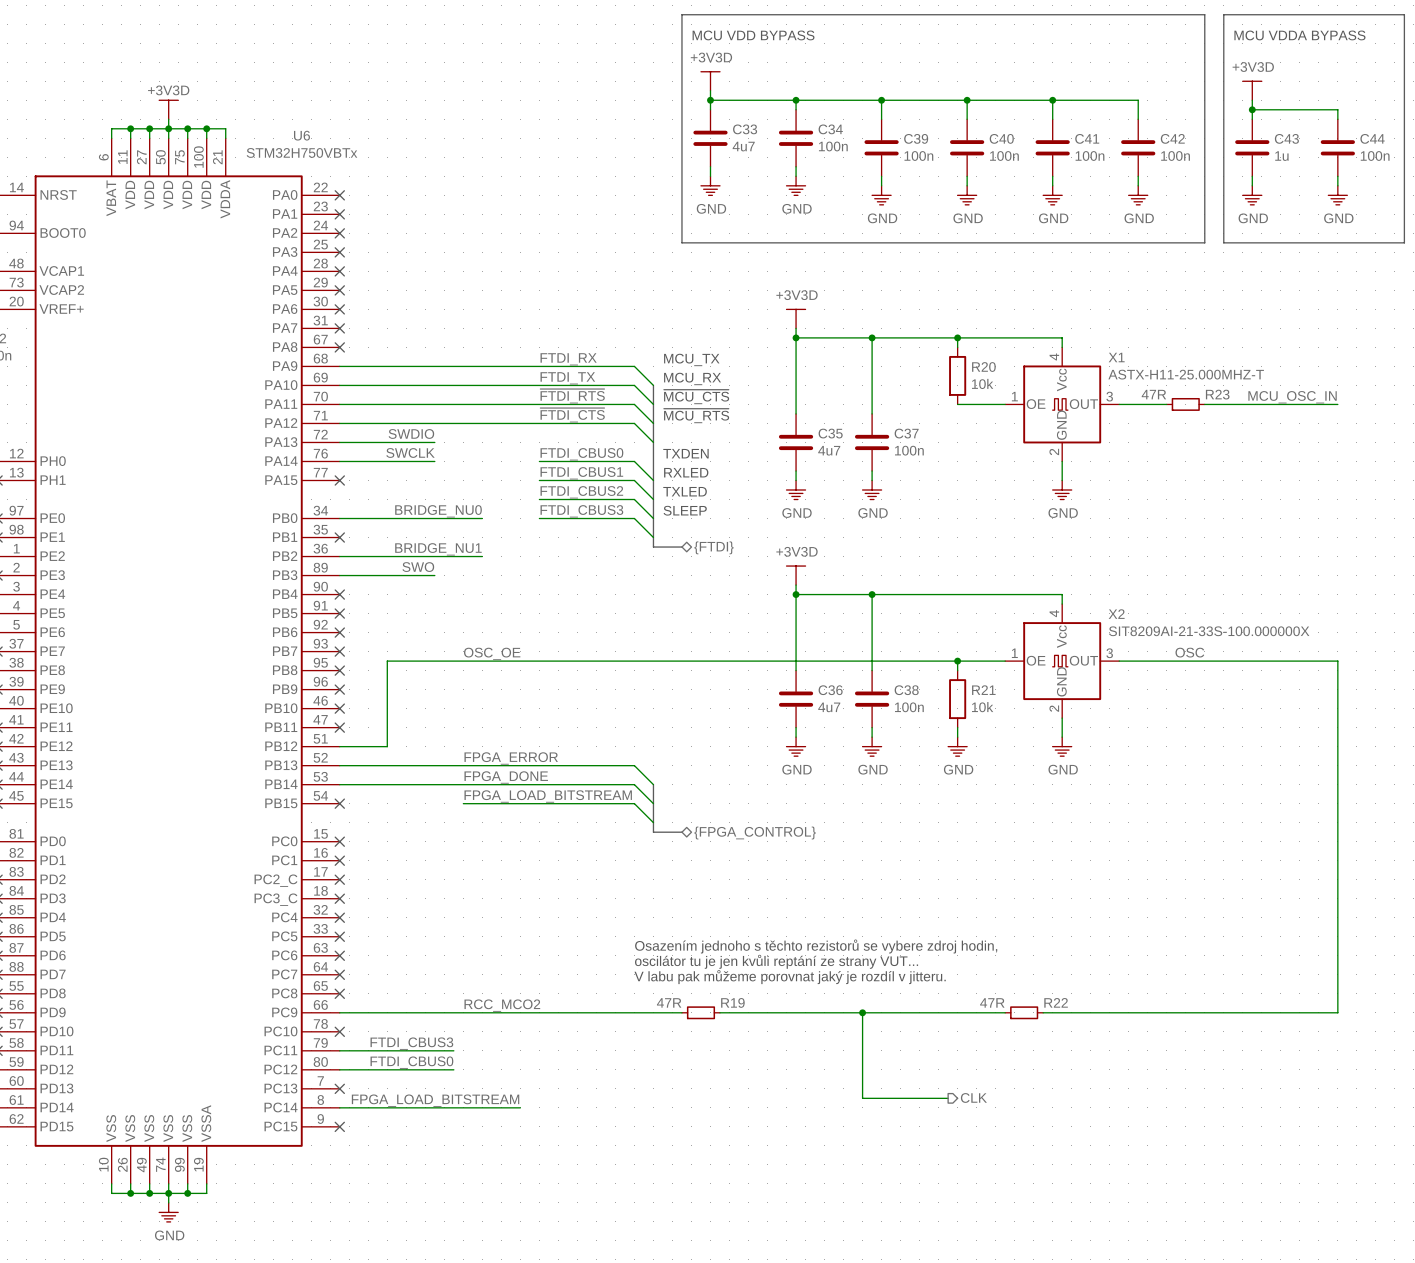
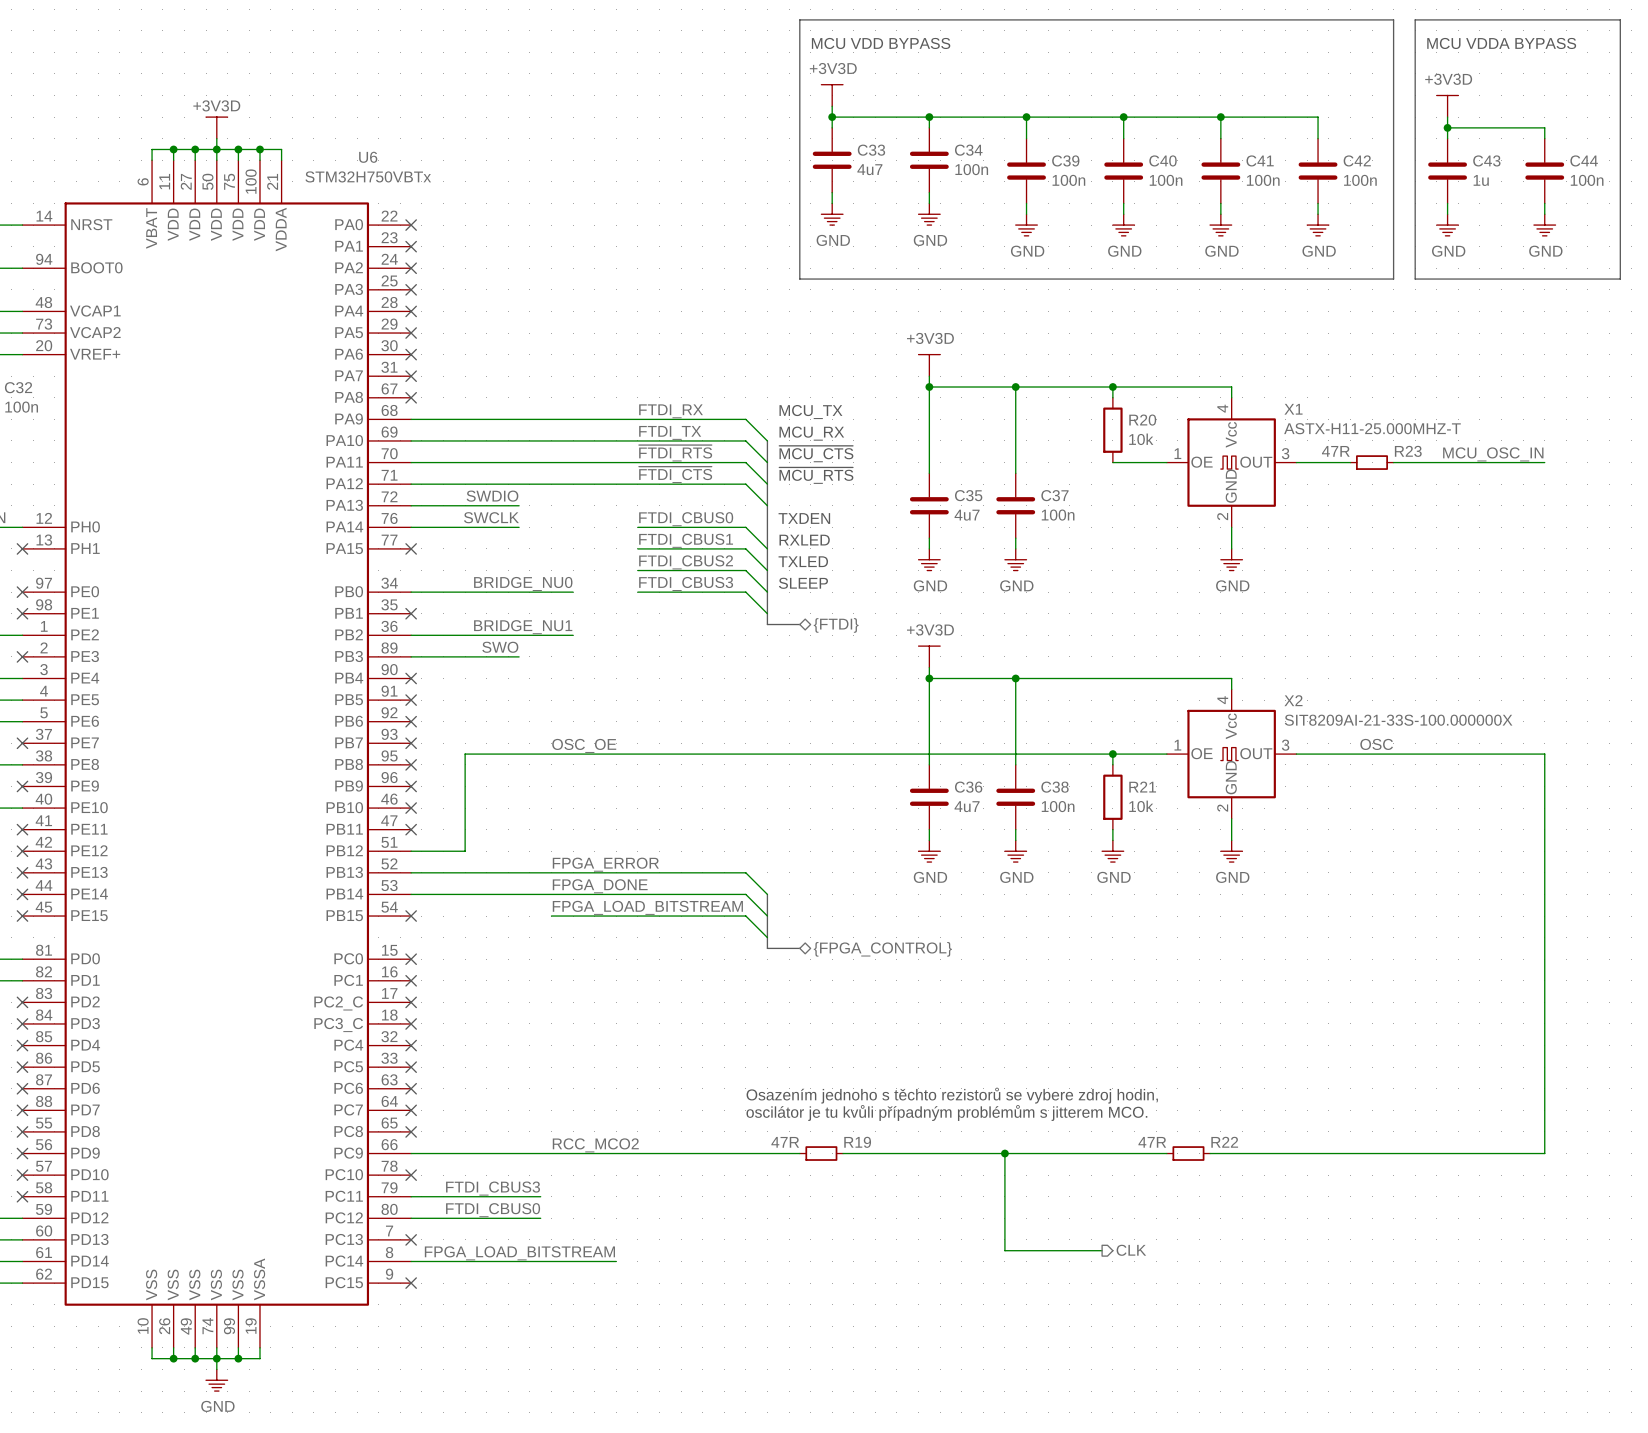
text: Osazením jednoho s těchto rezistorů se vybere zdroj hodin, (816, 946) -> none
text: oscilátor tu je jen kvůli reptání ze strany VUT... (776, 961) -> Osazením jednoho s těchto rezistorů se vybere zdroj hodin, (952, 1095)
text: V labu pak můžeme porovnat jaký je rozdíl v jitteru. (790, 977) -> oscilátor je tu kvůli případným problémům s jitterem MCO. (946, 1113)

